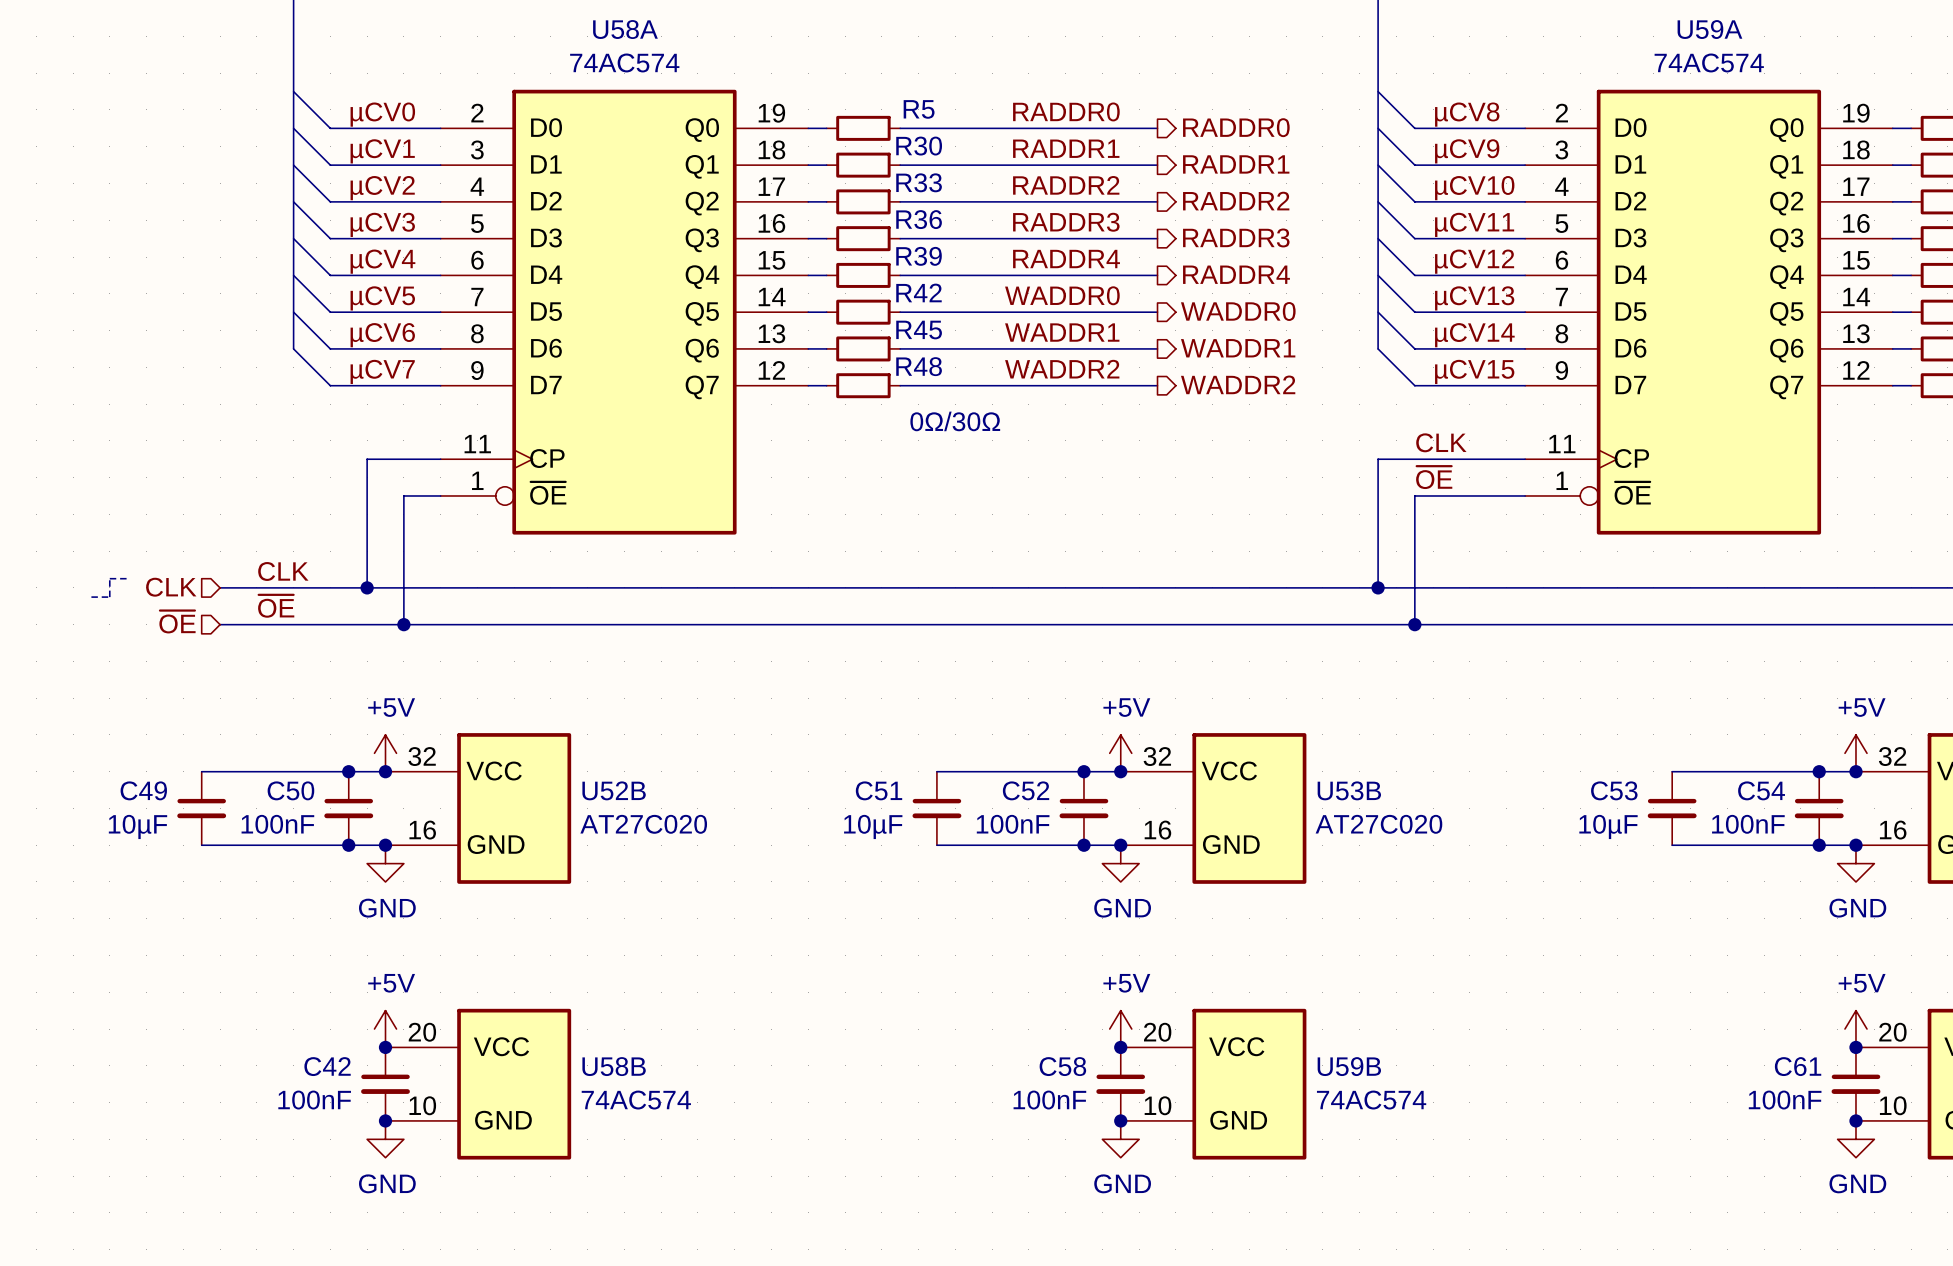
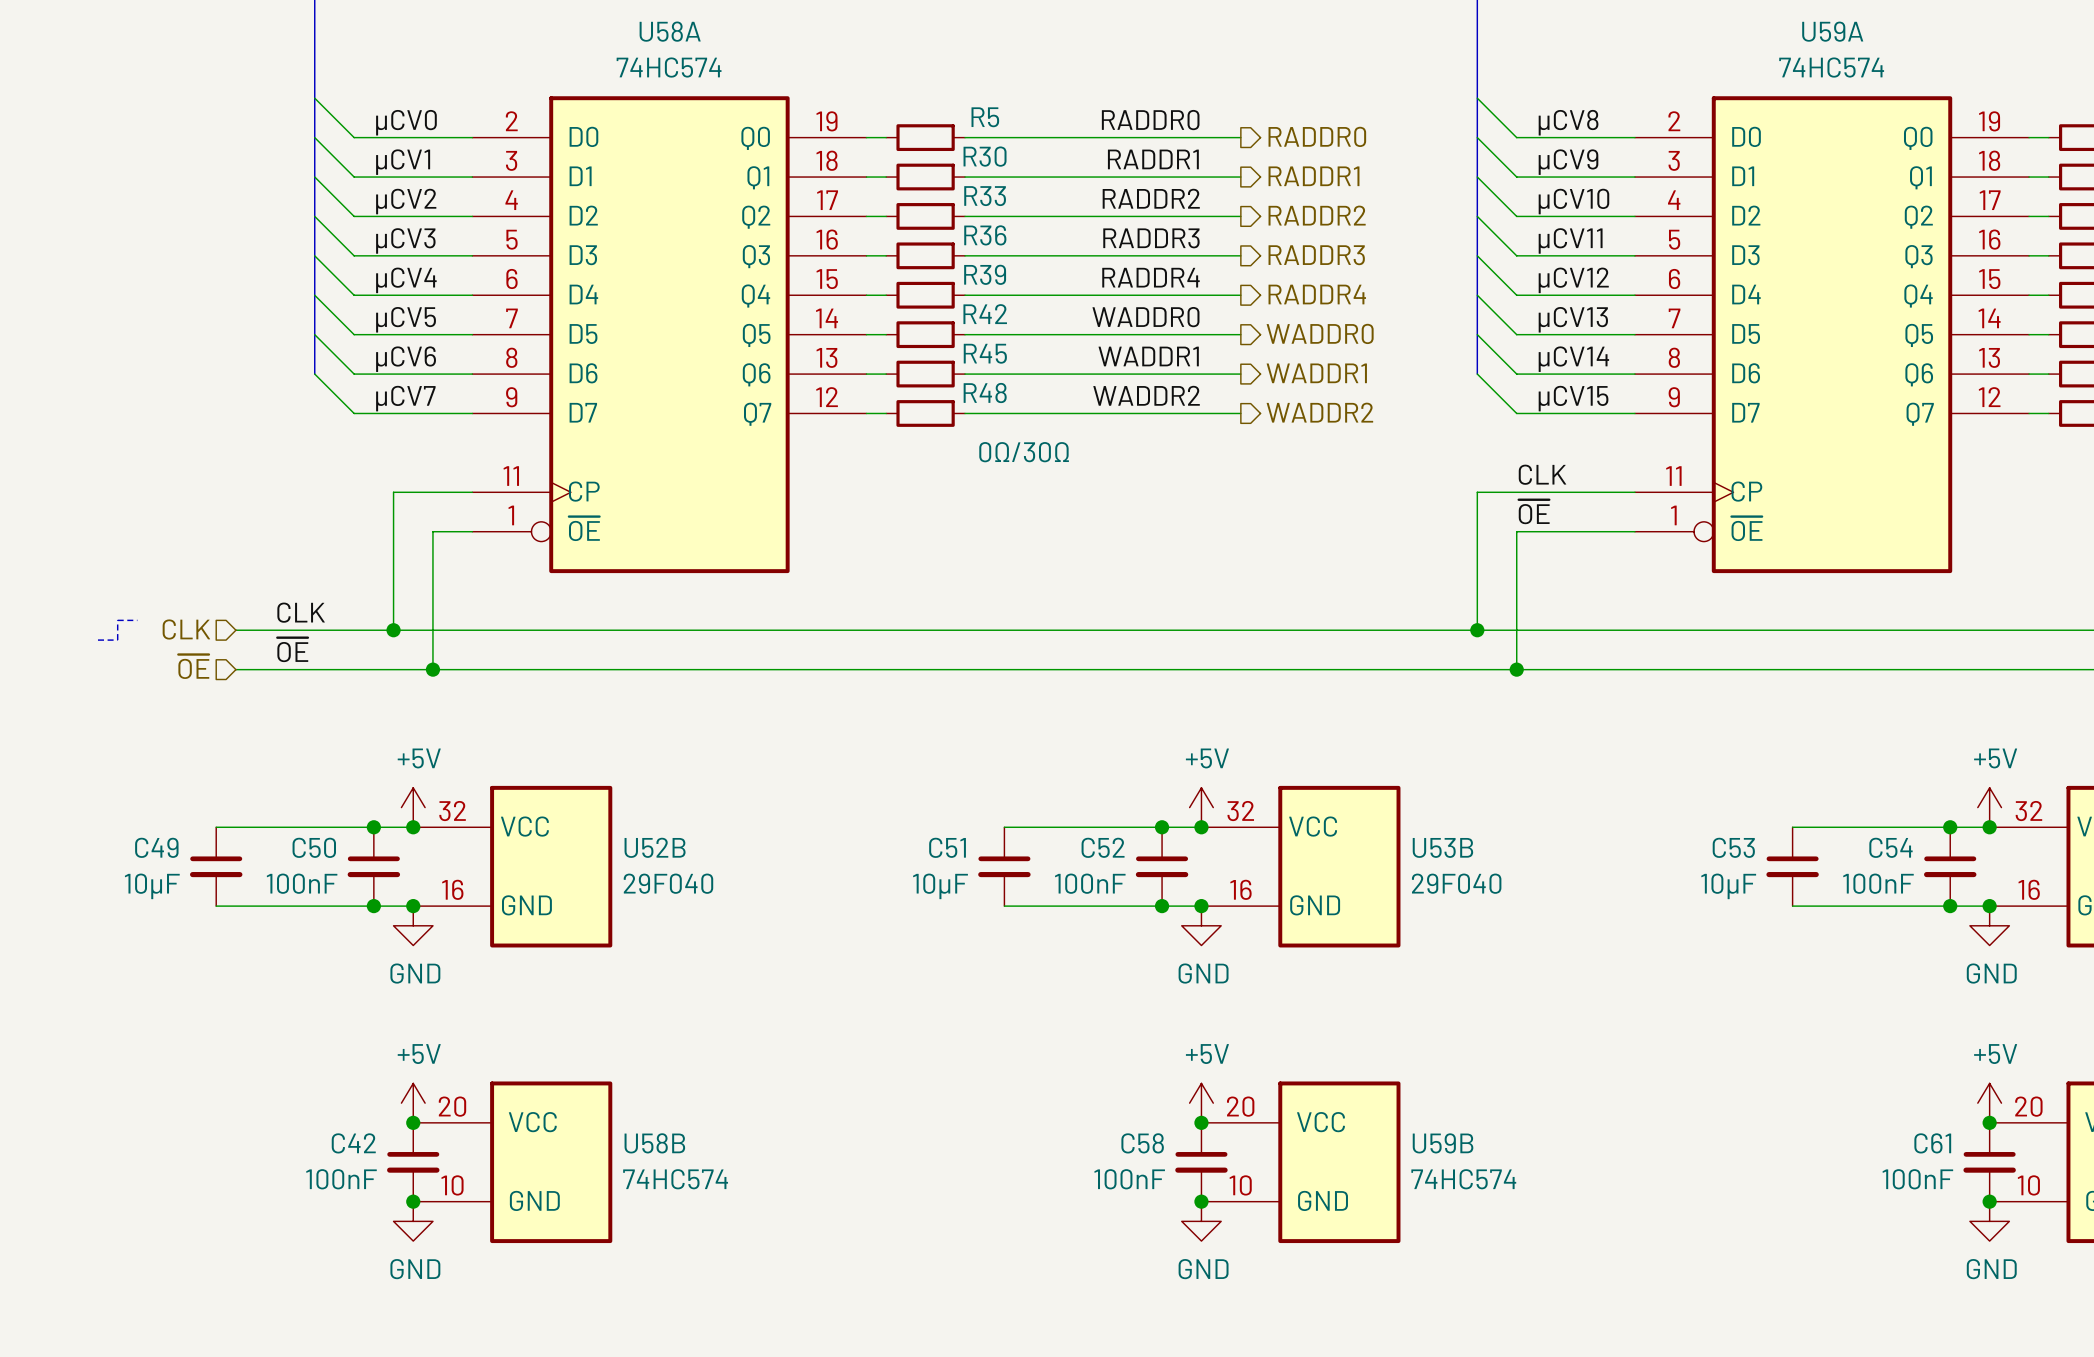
U58A value: 74AC574 (624, 62) -> 74HC574 (669, 67)
U59A value: 74AC574 (1709, 62) -> 74HC574 (1831, 67)
U52B value: AT27C020 (643, 824) -> 29F040 (668, 883)
U53B value: AT27C020 (1378, 824) -> 29F040 (1456, 883)
U58B value: 74AC574 (636, 1100) -> 74HC574 (675, 1179)
U59B value: 74AC574 (1371, 1100) -> 74HC574 (1463, 1179)

